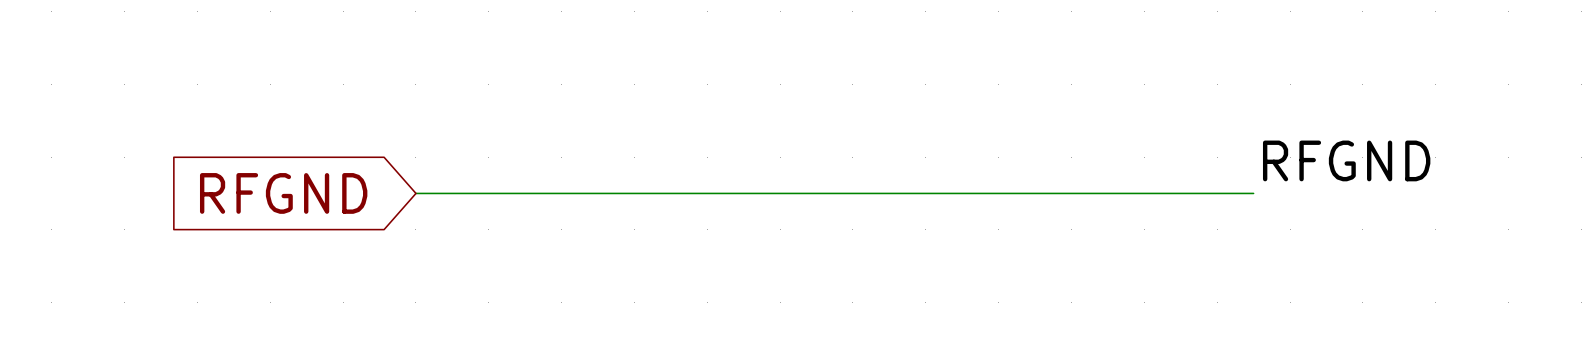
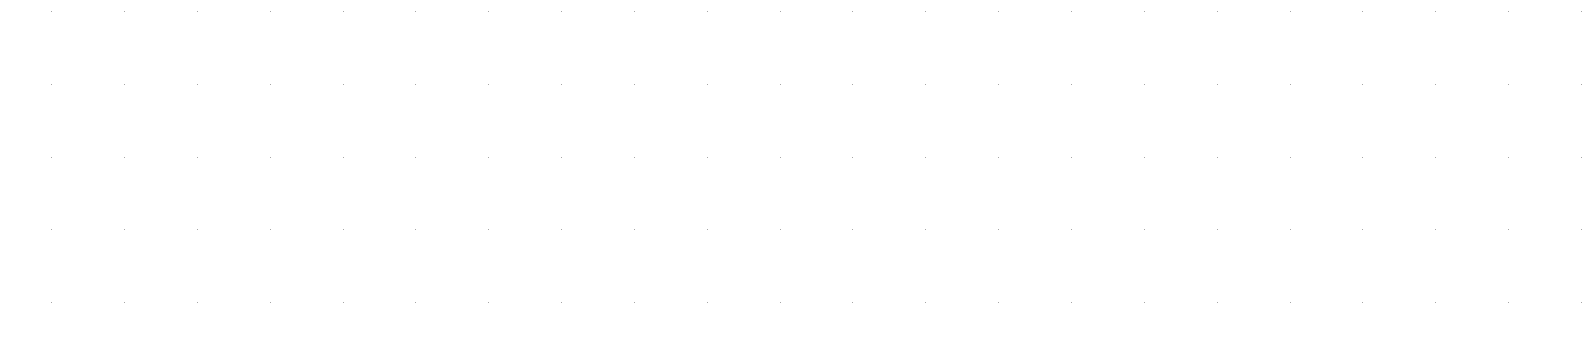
label: RFGND (1346, 160) -> none
global label: RFGND (283, 193) -> none
wire: (415, 193) (1253, 193) -> none

